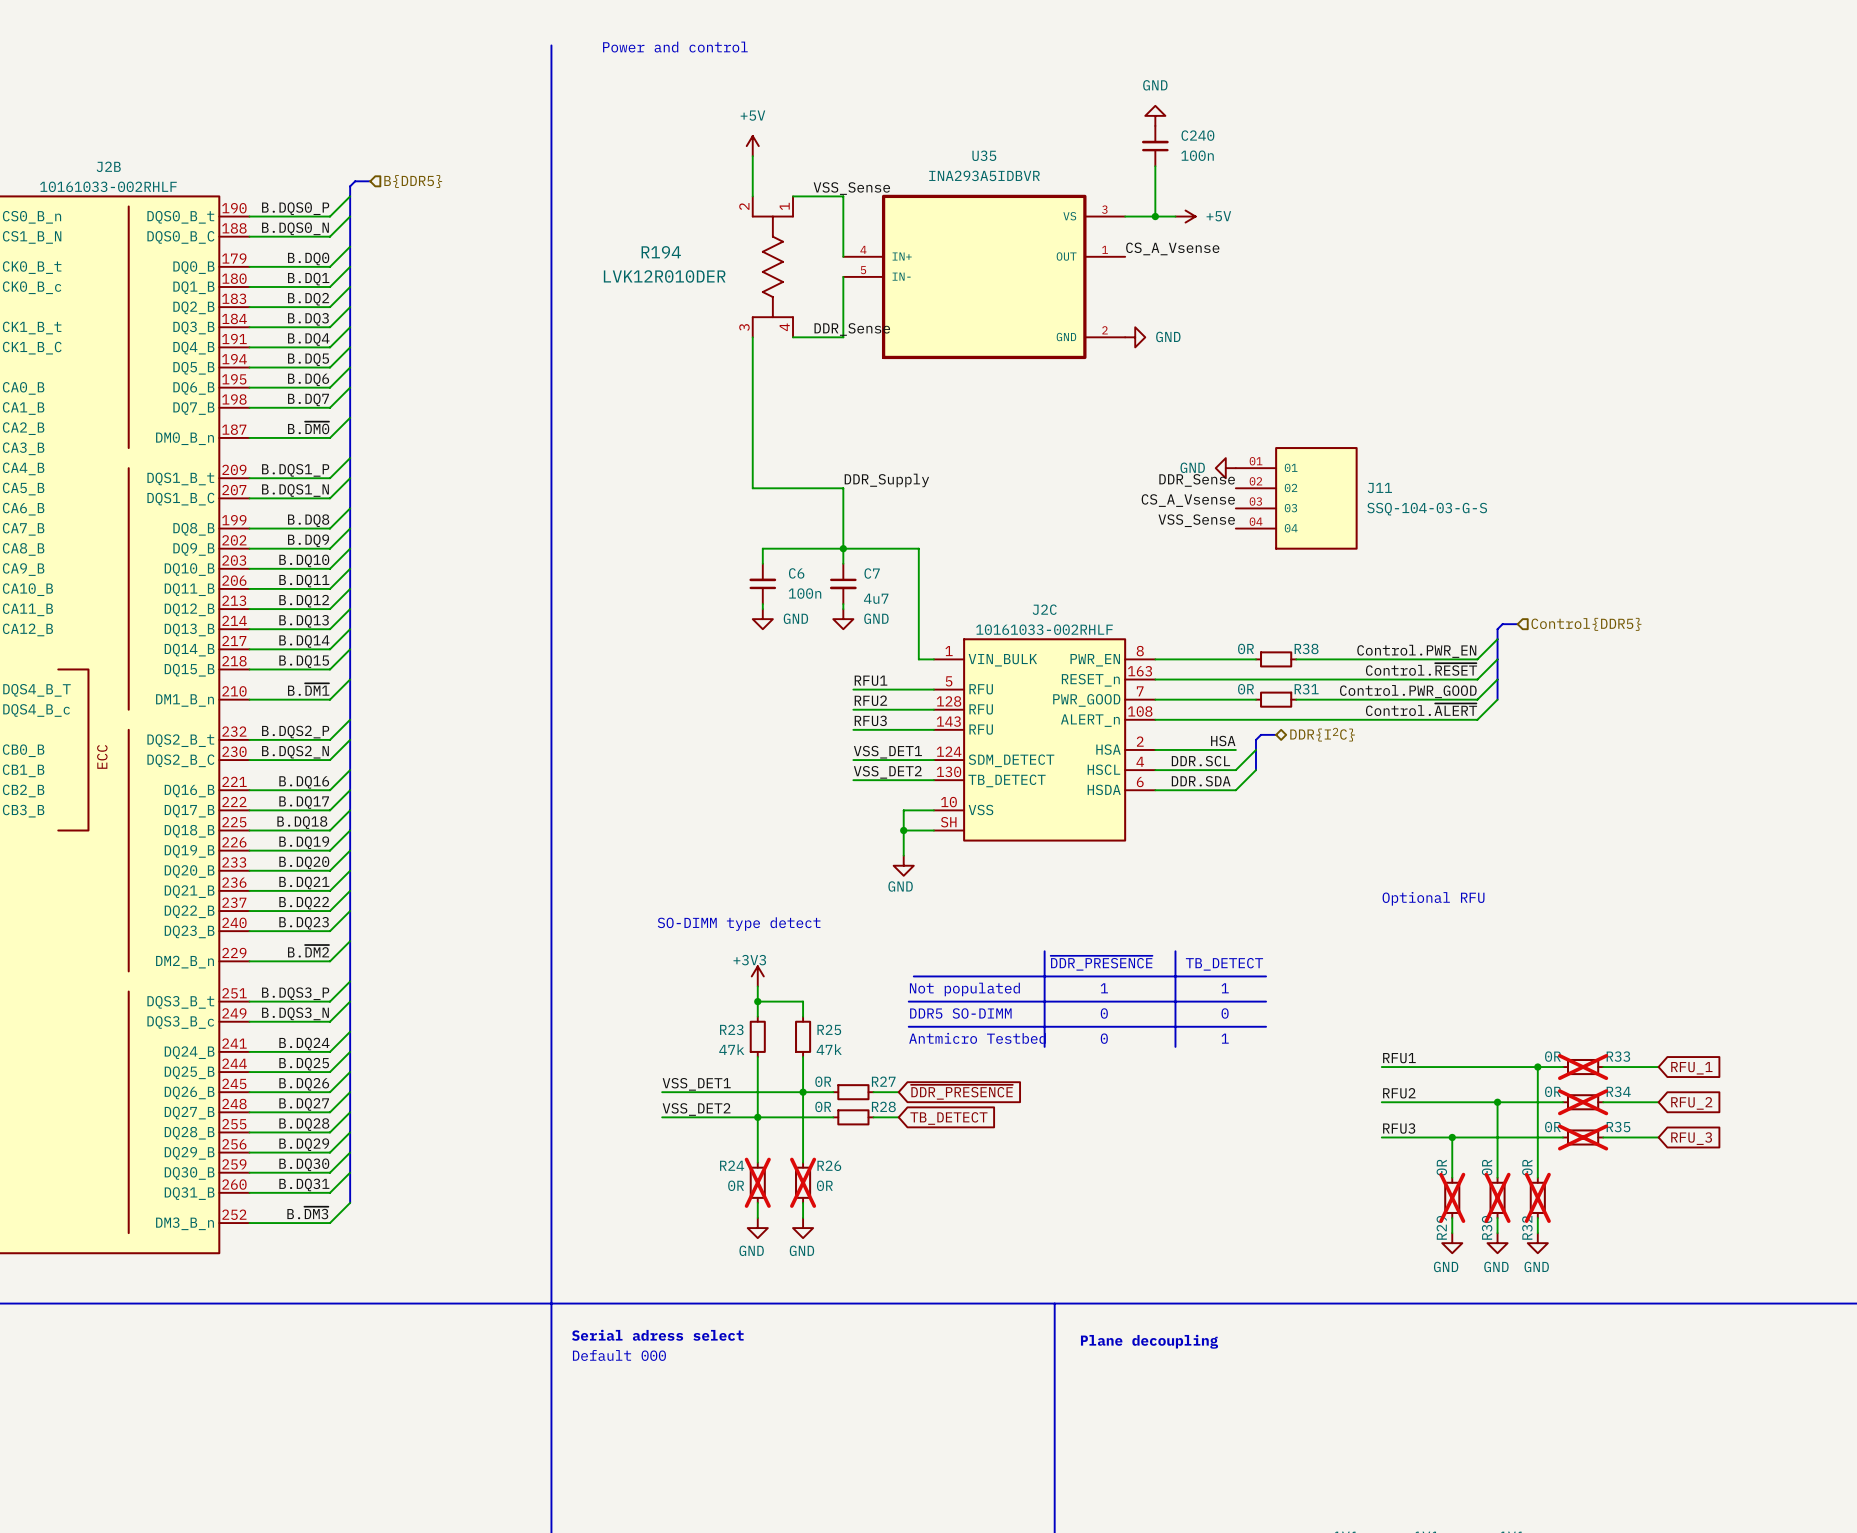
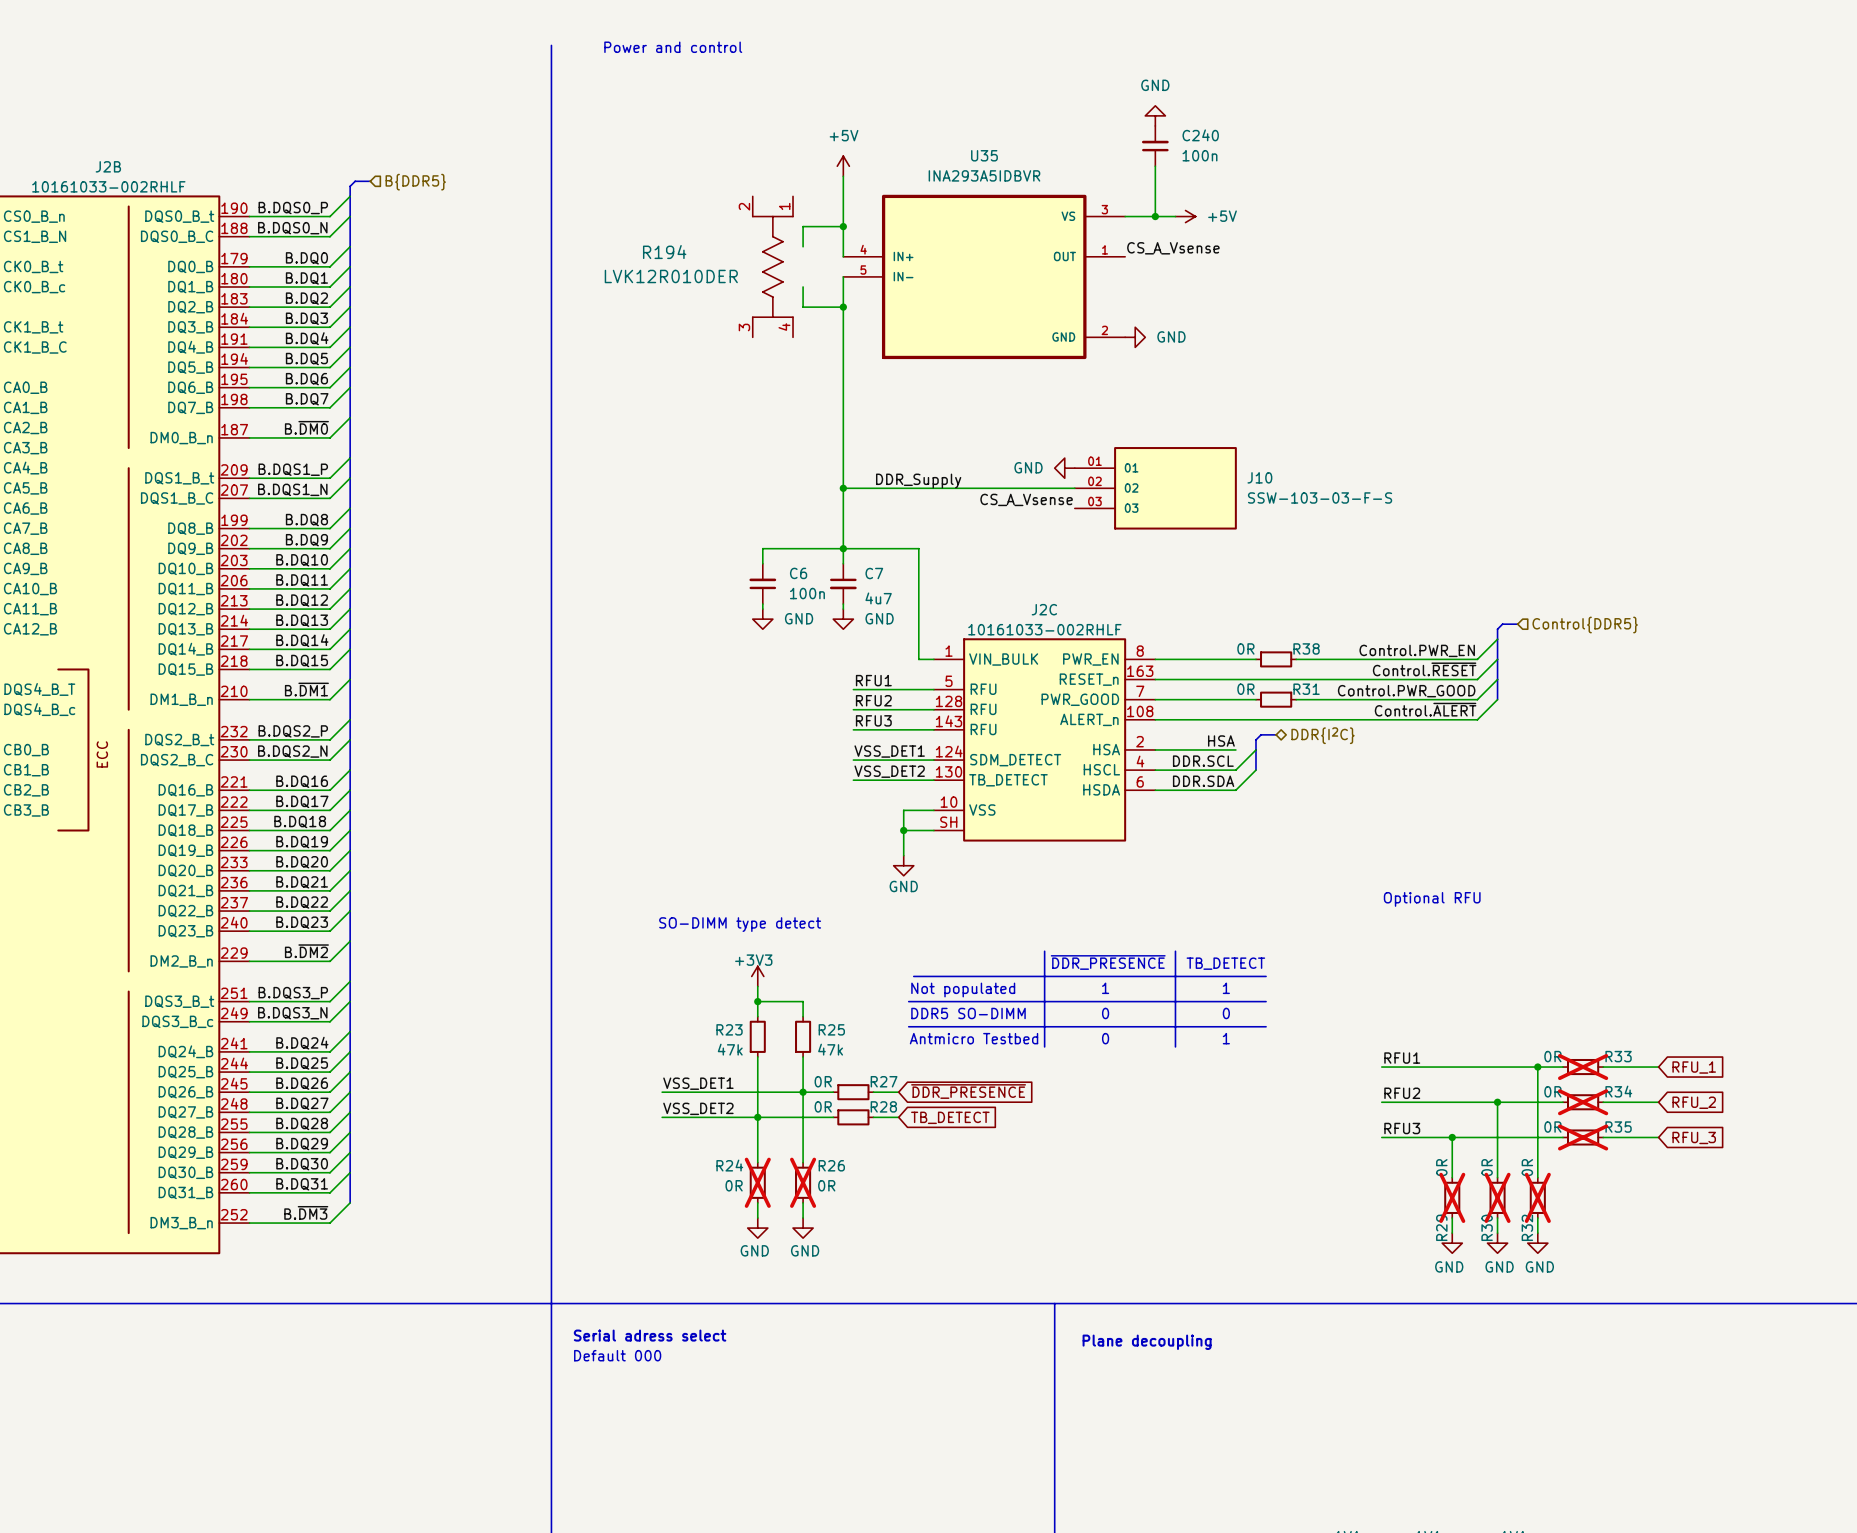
power symbol position: +5V (752, 146) -> +5V (843, 166)
wire: (752, 156) (752, 196) -> none
label: VSS_Sense (851, 188) -> none
wire: (793, 196) (843, 196) -> (843, 176) (843, 196)
wire: none -> (843, 226) (803, 226) (803, 246)
junction: none -> (843, 226)
wire: none -> (803, 287) (803, 307) (843, 307)
junction: none -> (843, 307)
label: DDR_Sense (852, 329) -> none
wire: (752, 337) (752, 488) (843, 488) -> none
wire: (793, 337) (843, 337) -> (1074, 488) (843, 488) (843, 337)
power symbol position: GND (1225, 468) -> GND (1064, 468)
label position: DDR_Supply (886, 480) -> DDR_Supply (918, 480)
label: DDR_Sense (1197, 480) -> none
junction: none -> (843, 488)
J10: none -> SSW-103-03-F-S (1155, 488)
J11: SSQ-104-03-G-S (1296, 498) -> none
label position: CS_A_Vsense (1188, 500) -> CS_A_Vsense (1026, 499)
label: VSS_Sense (1196, 520) -> none

